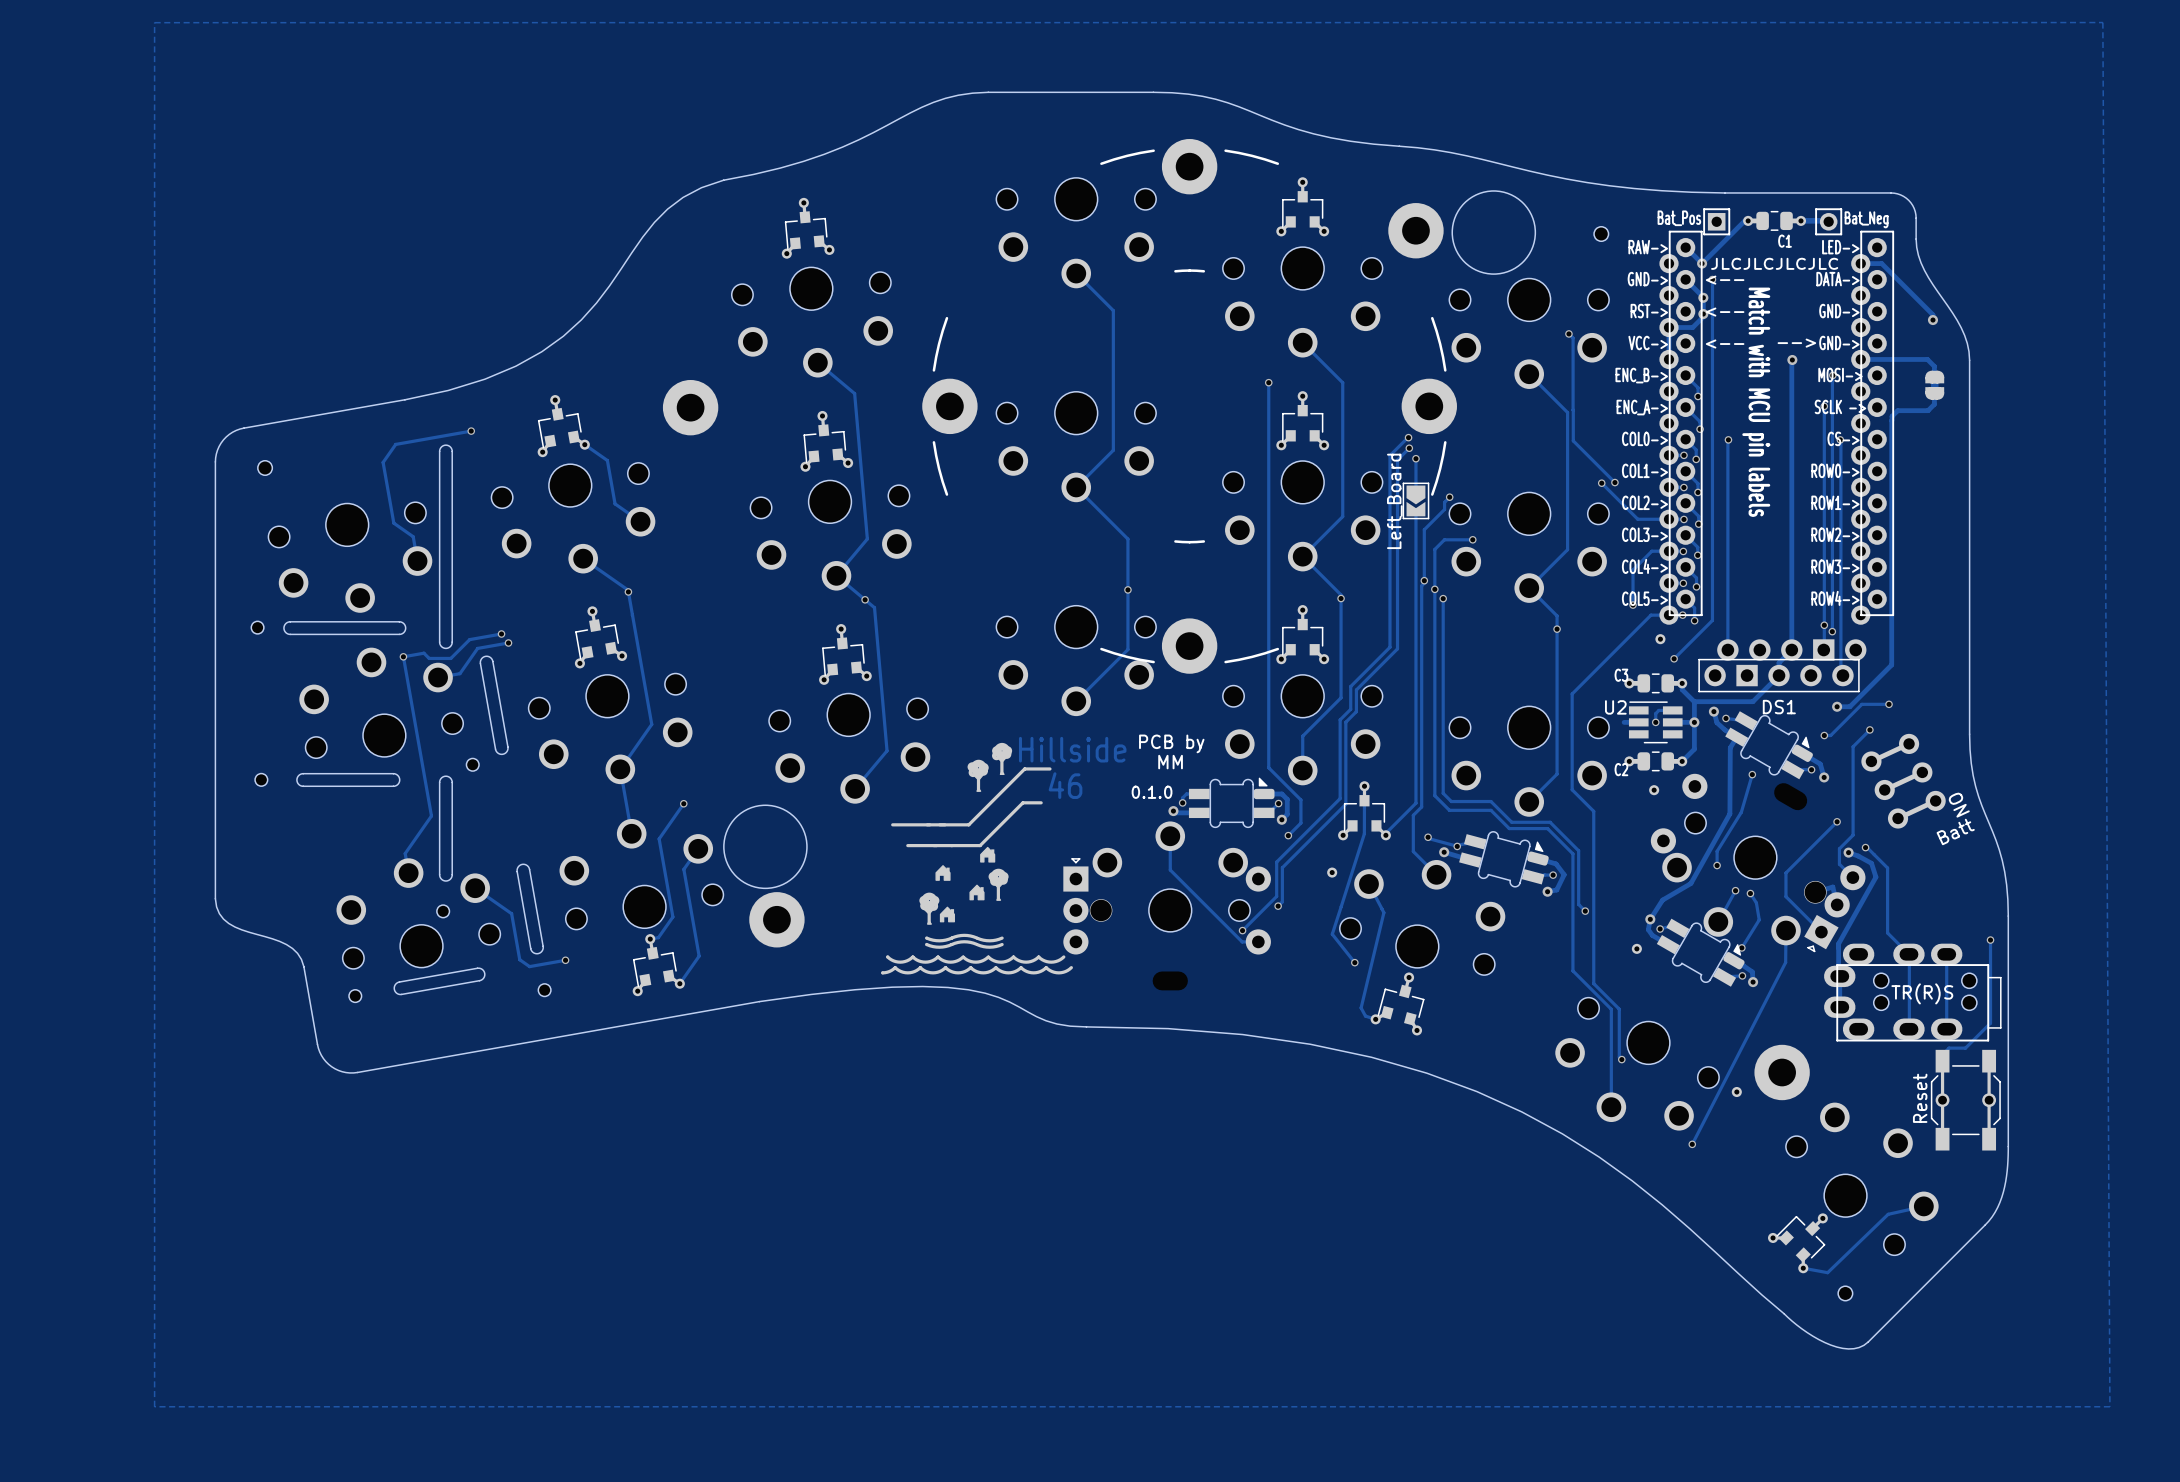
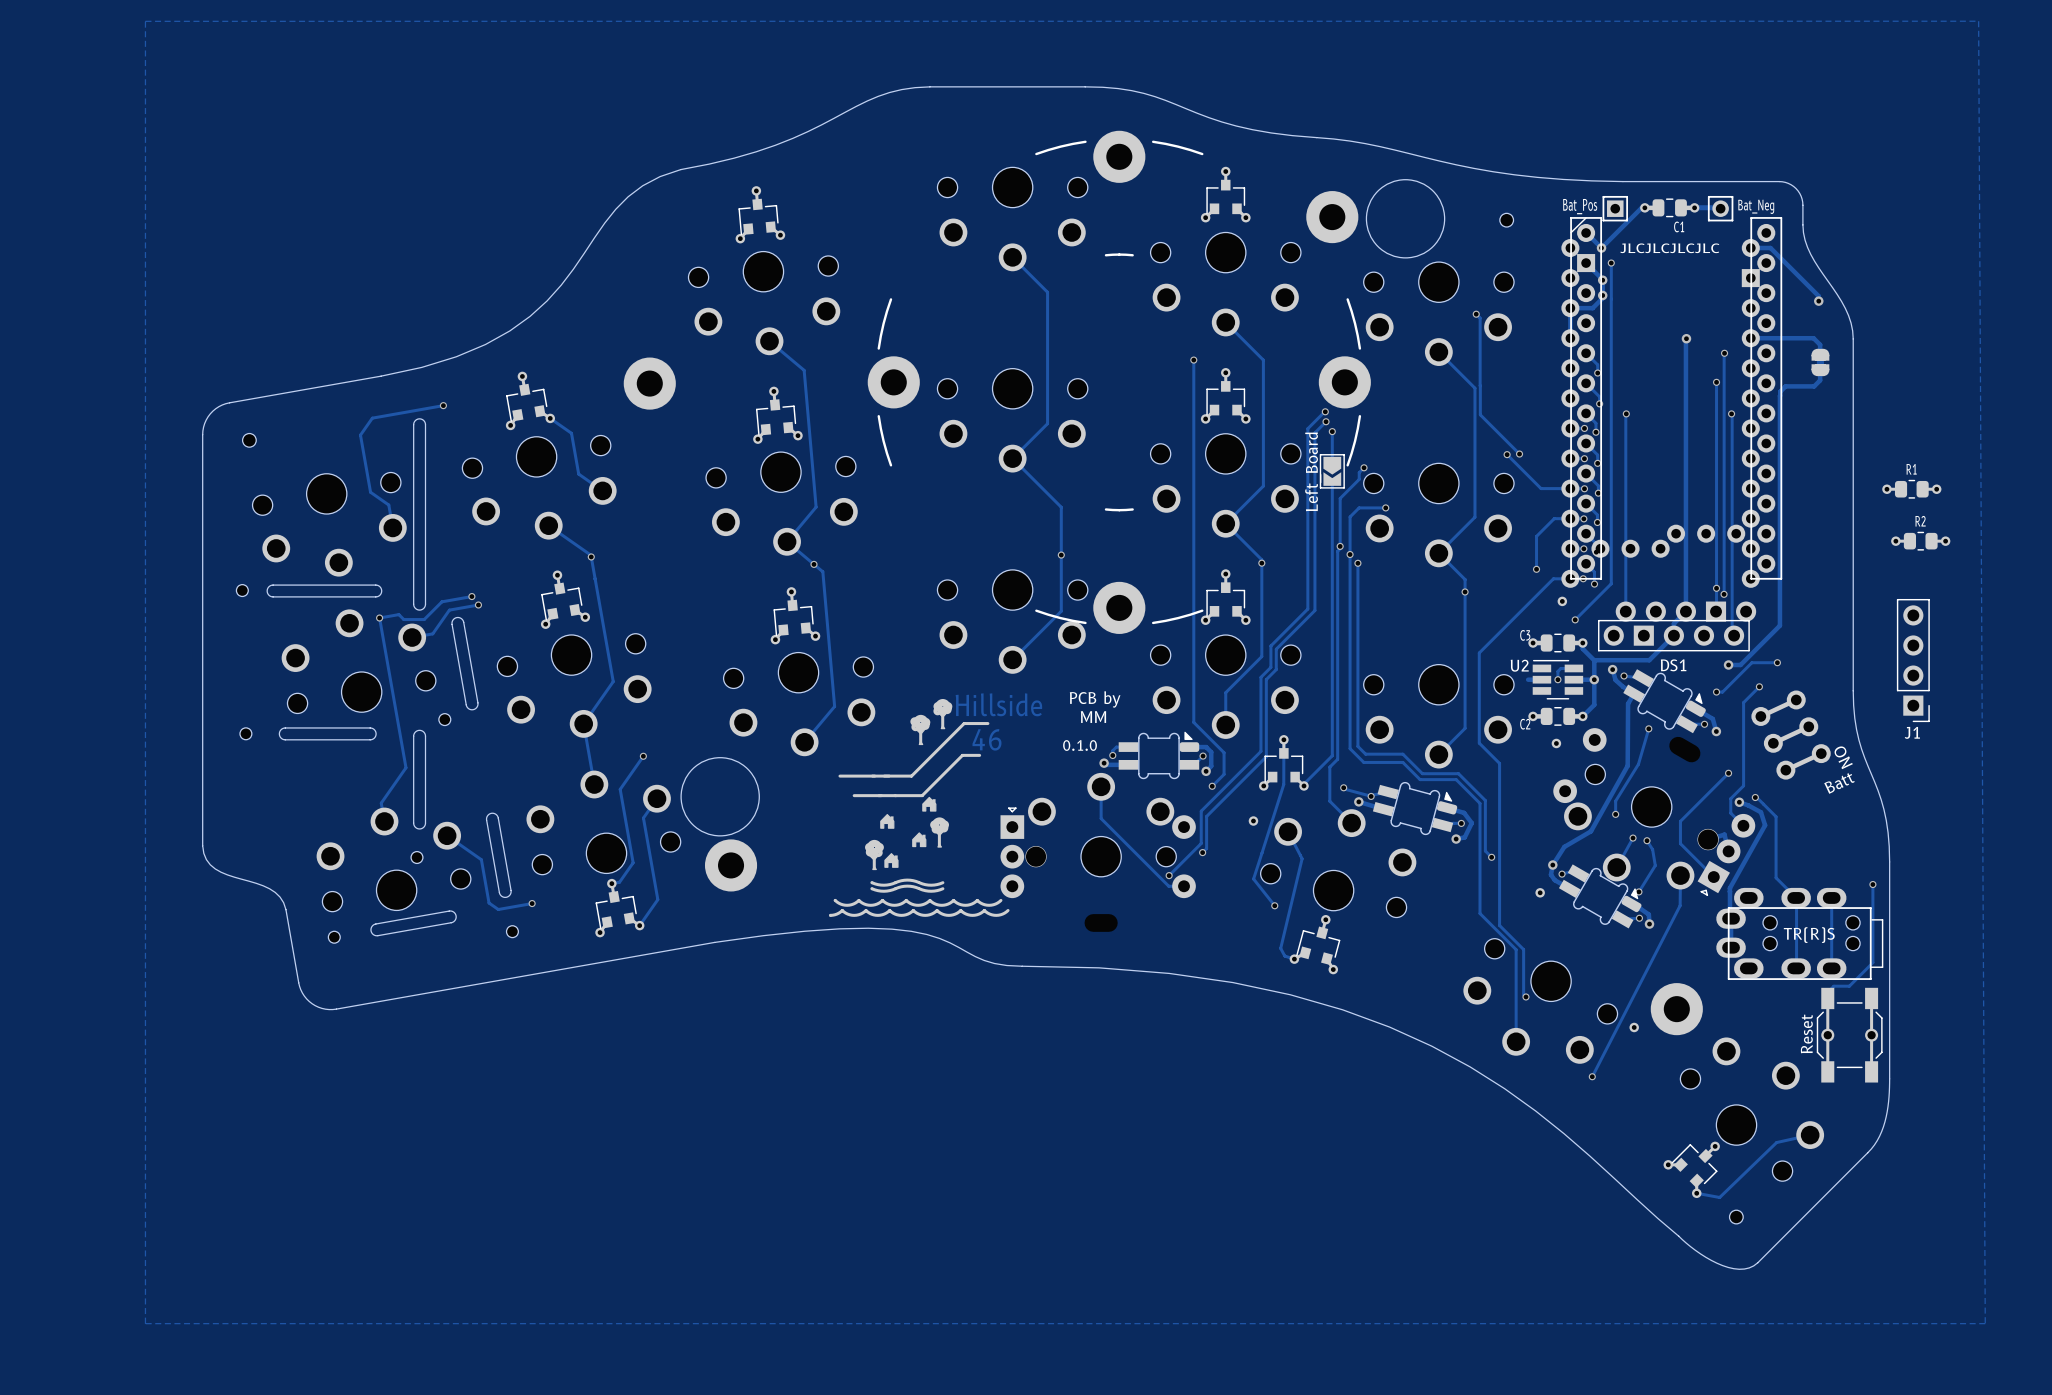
part footprint: [1659, 230, 1895, 625] -> [1561, 217, 1783, 588]
R1: none -> (1911, 489)
R2: none -> (1920, 541)
J1: none -> (1913, 660)

